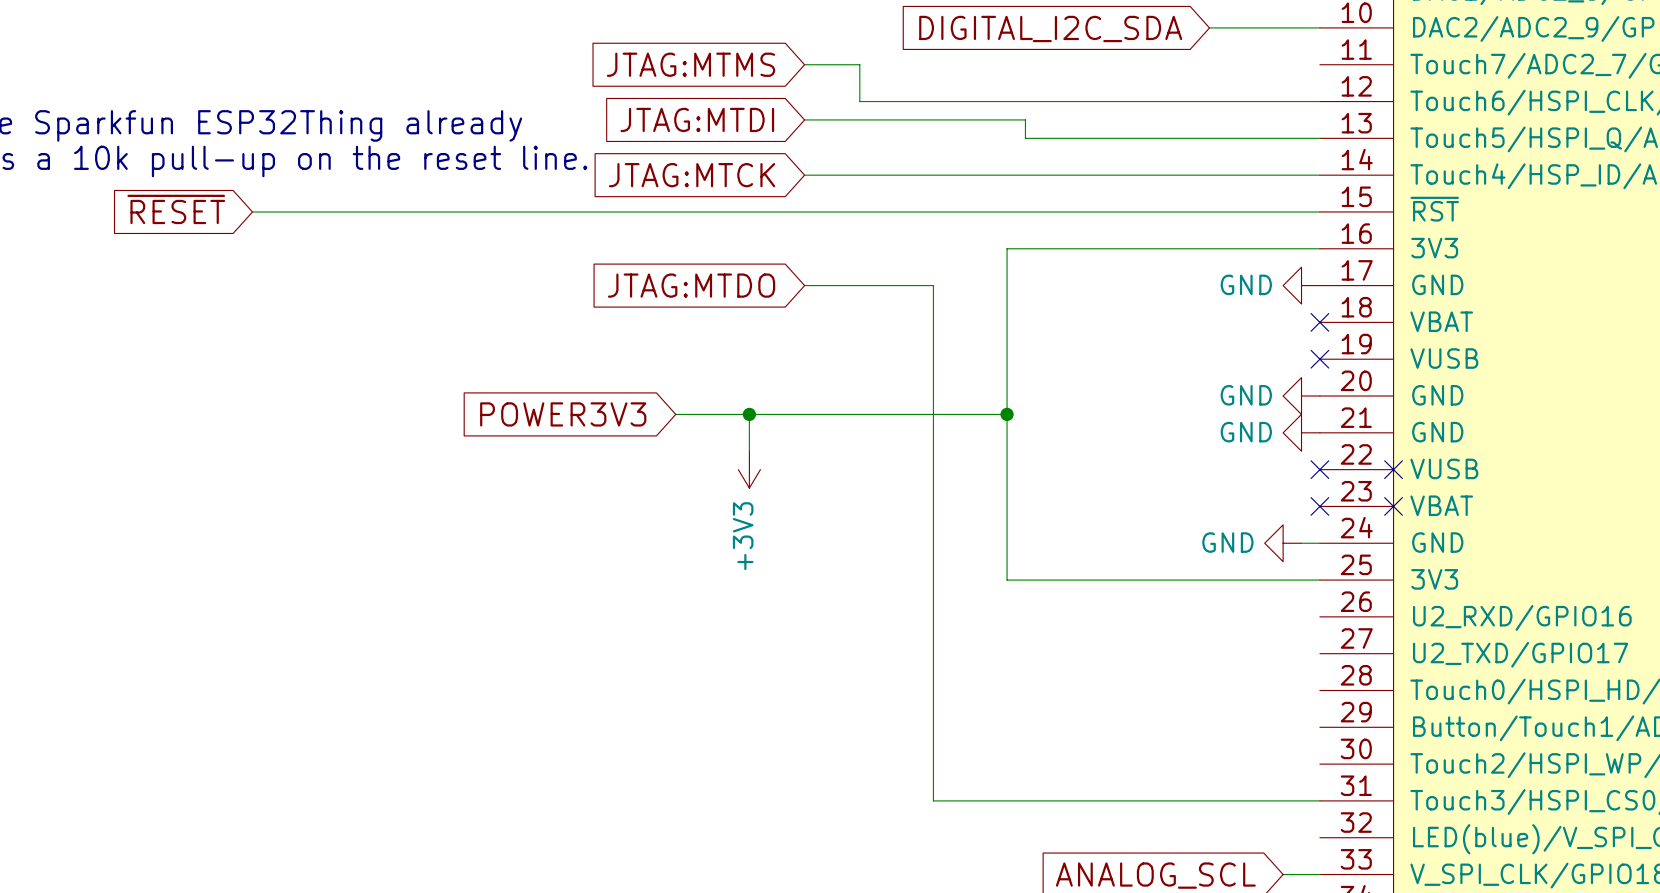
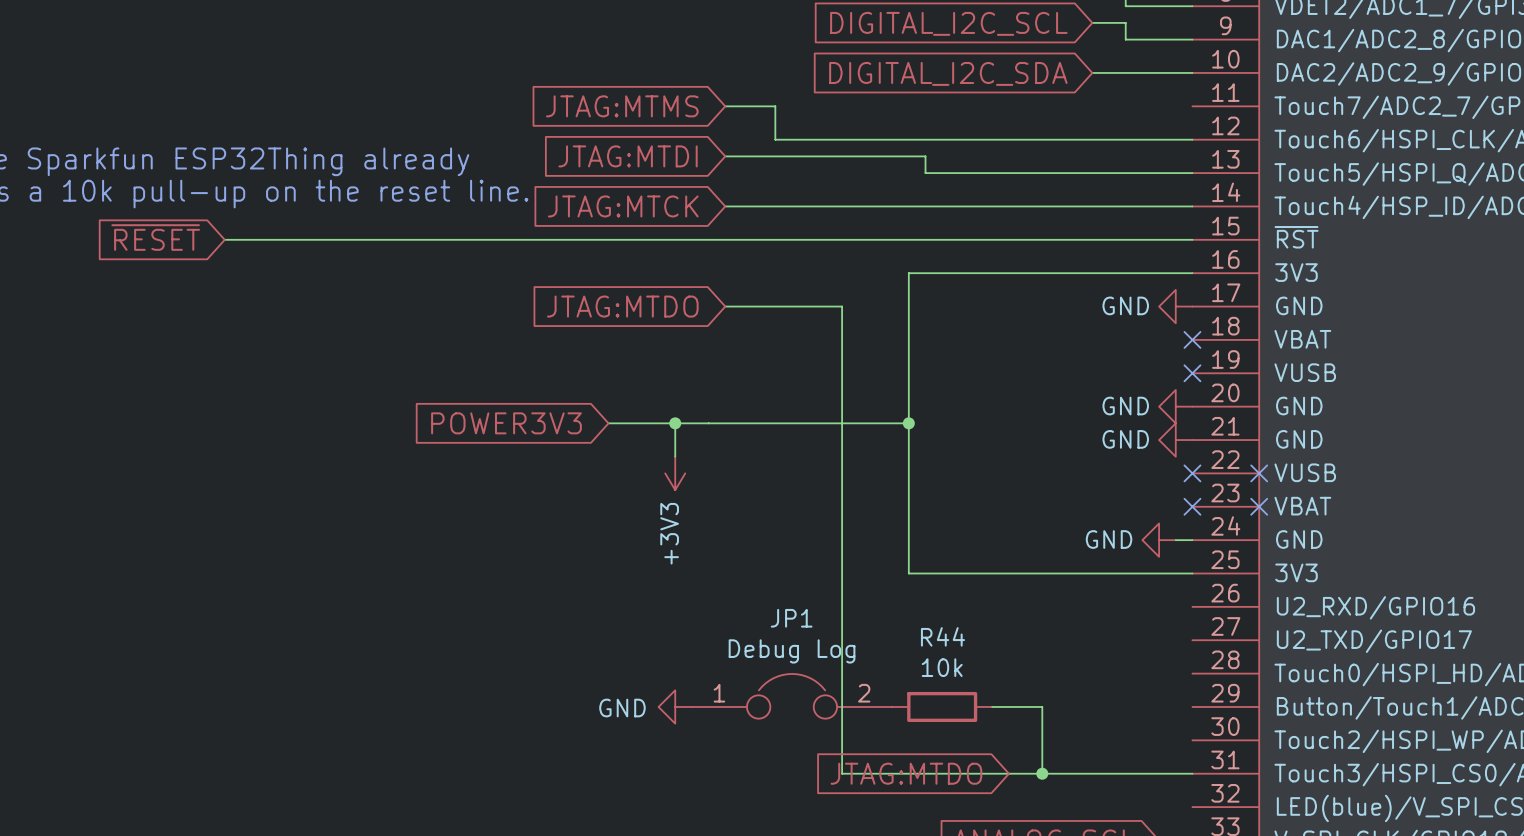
JP1: none -> Debug Log (792, 696)
power symbol: none -> GND (675, 706)
R44: none -> 10k (942, 706)
wire: none -> (992, 706) (1042, 706) (1042, 773)
global label: none -> JTAG:MTDO (906, 773)
junction: none -> (1042, 773)

